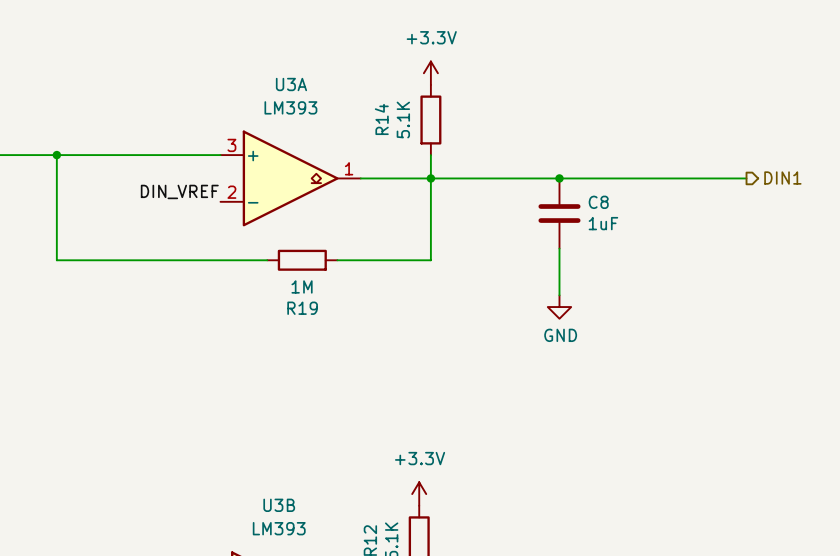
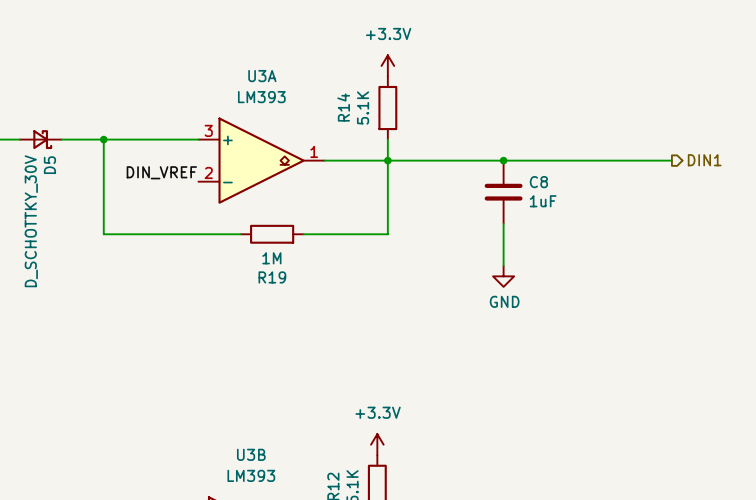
D5: none -> D_SCHOTTKY_30V (40, 139)
wire: (56, 155) (56, 260) (115, 260) -> (103, 139) (103, 234)
junction: (56, 155) -> none
junction: none -> (103, 139)

